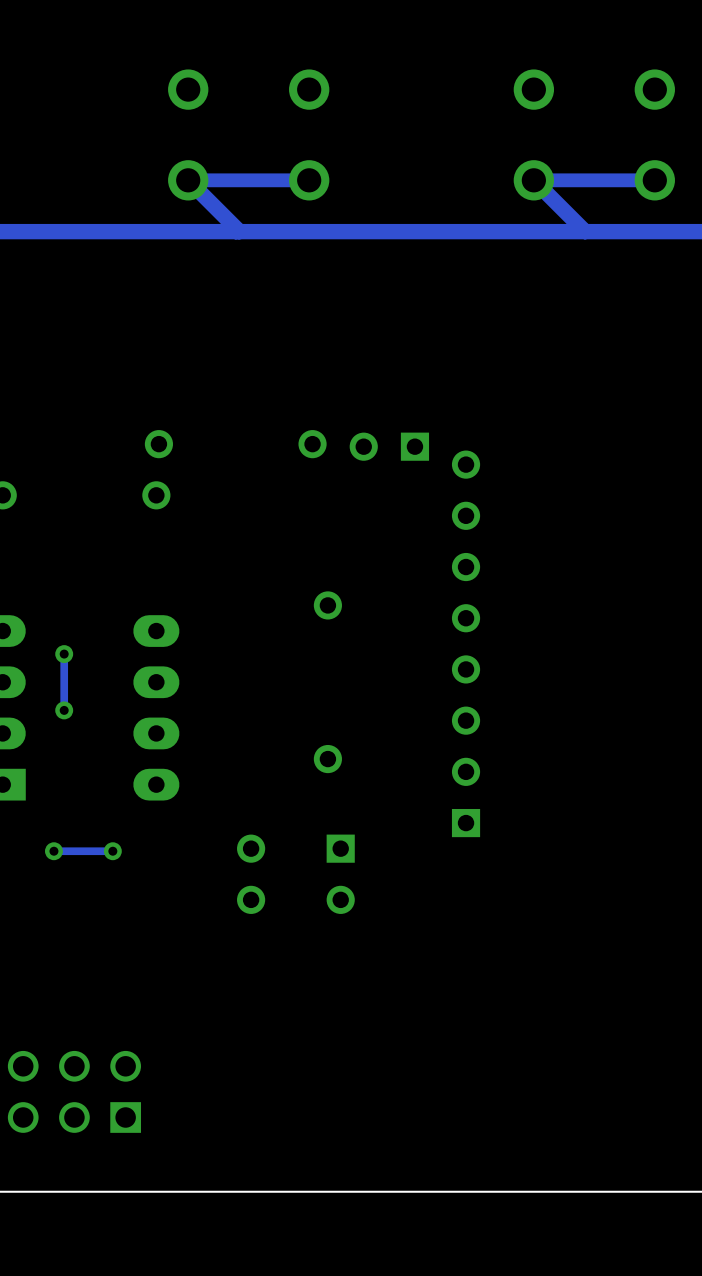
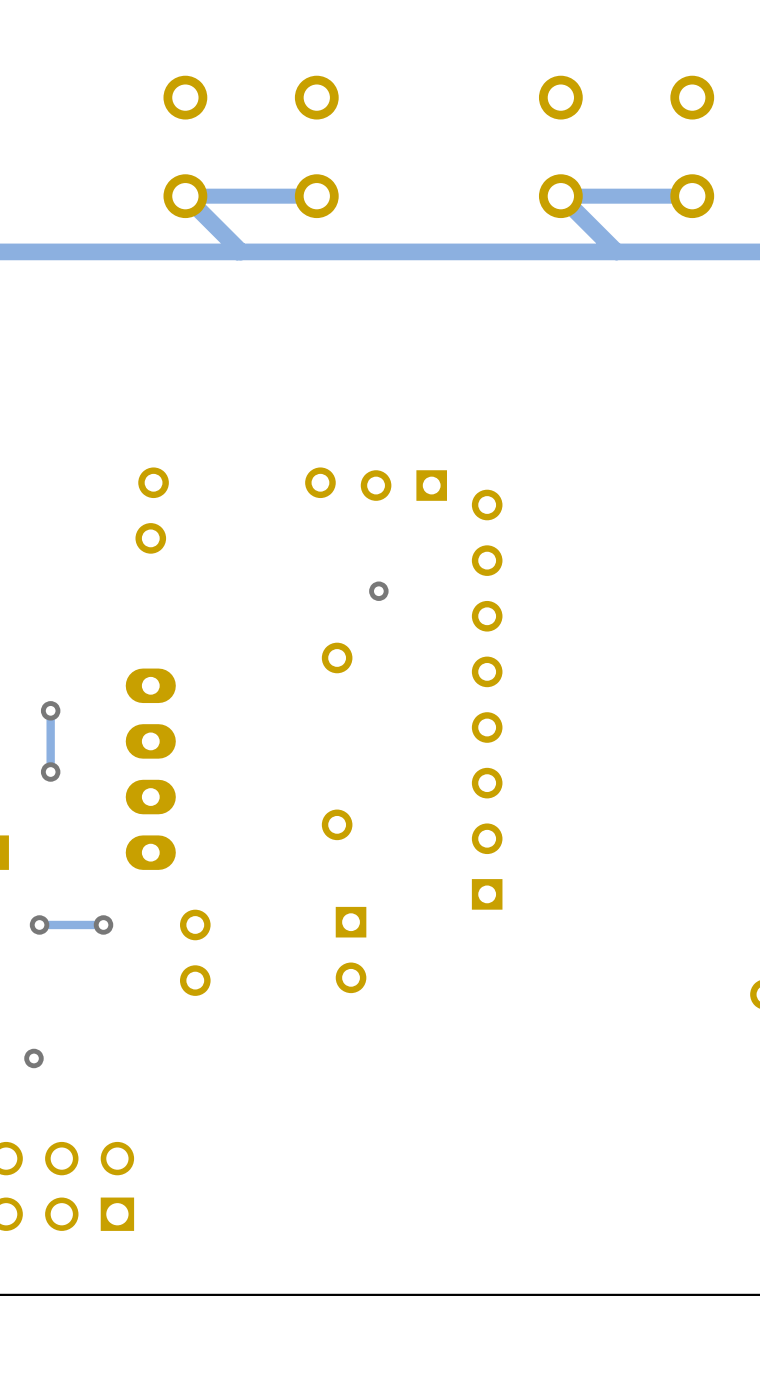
via: none -> (378, 591)
part position: (251, 874) -> (195, 952)
via: none -> (33, 1058)

